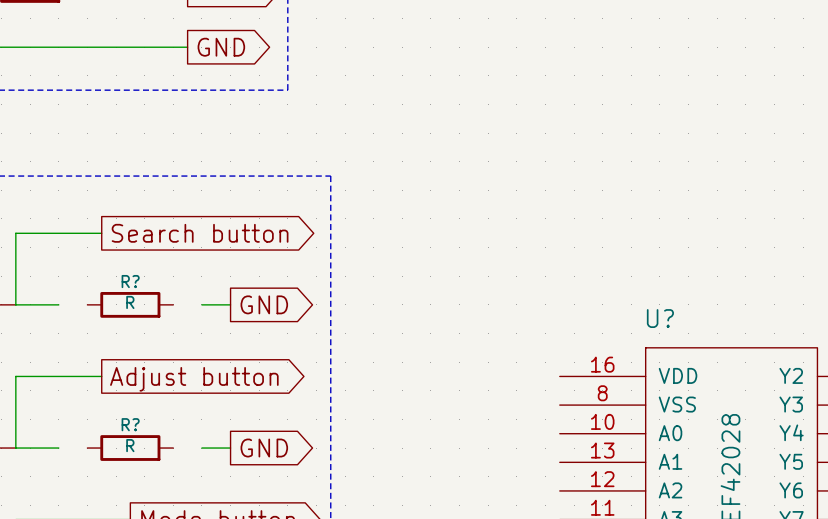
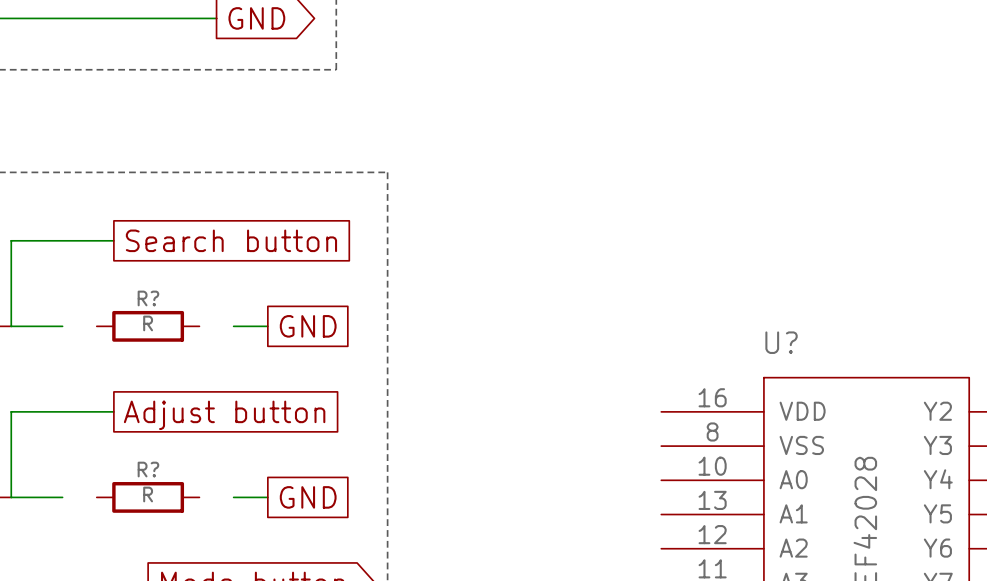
global label shape: output (200, 233) -> passive (231, 240)
global label shape: output (264, 304) -> passive (308, 326)
global label shape: output (194, 379) -> passive (224, 415)
global label shape: output (264, 448) -> passive (308, 497)

